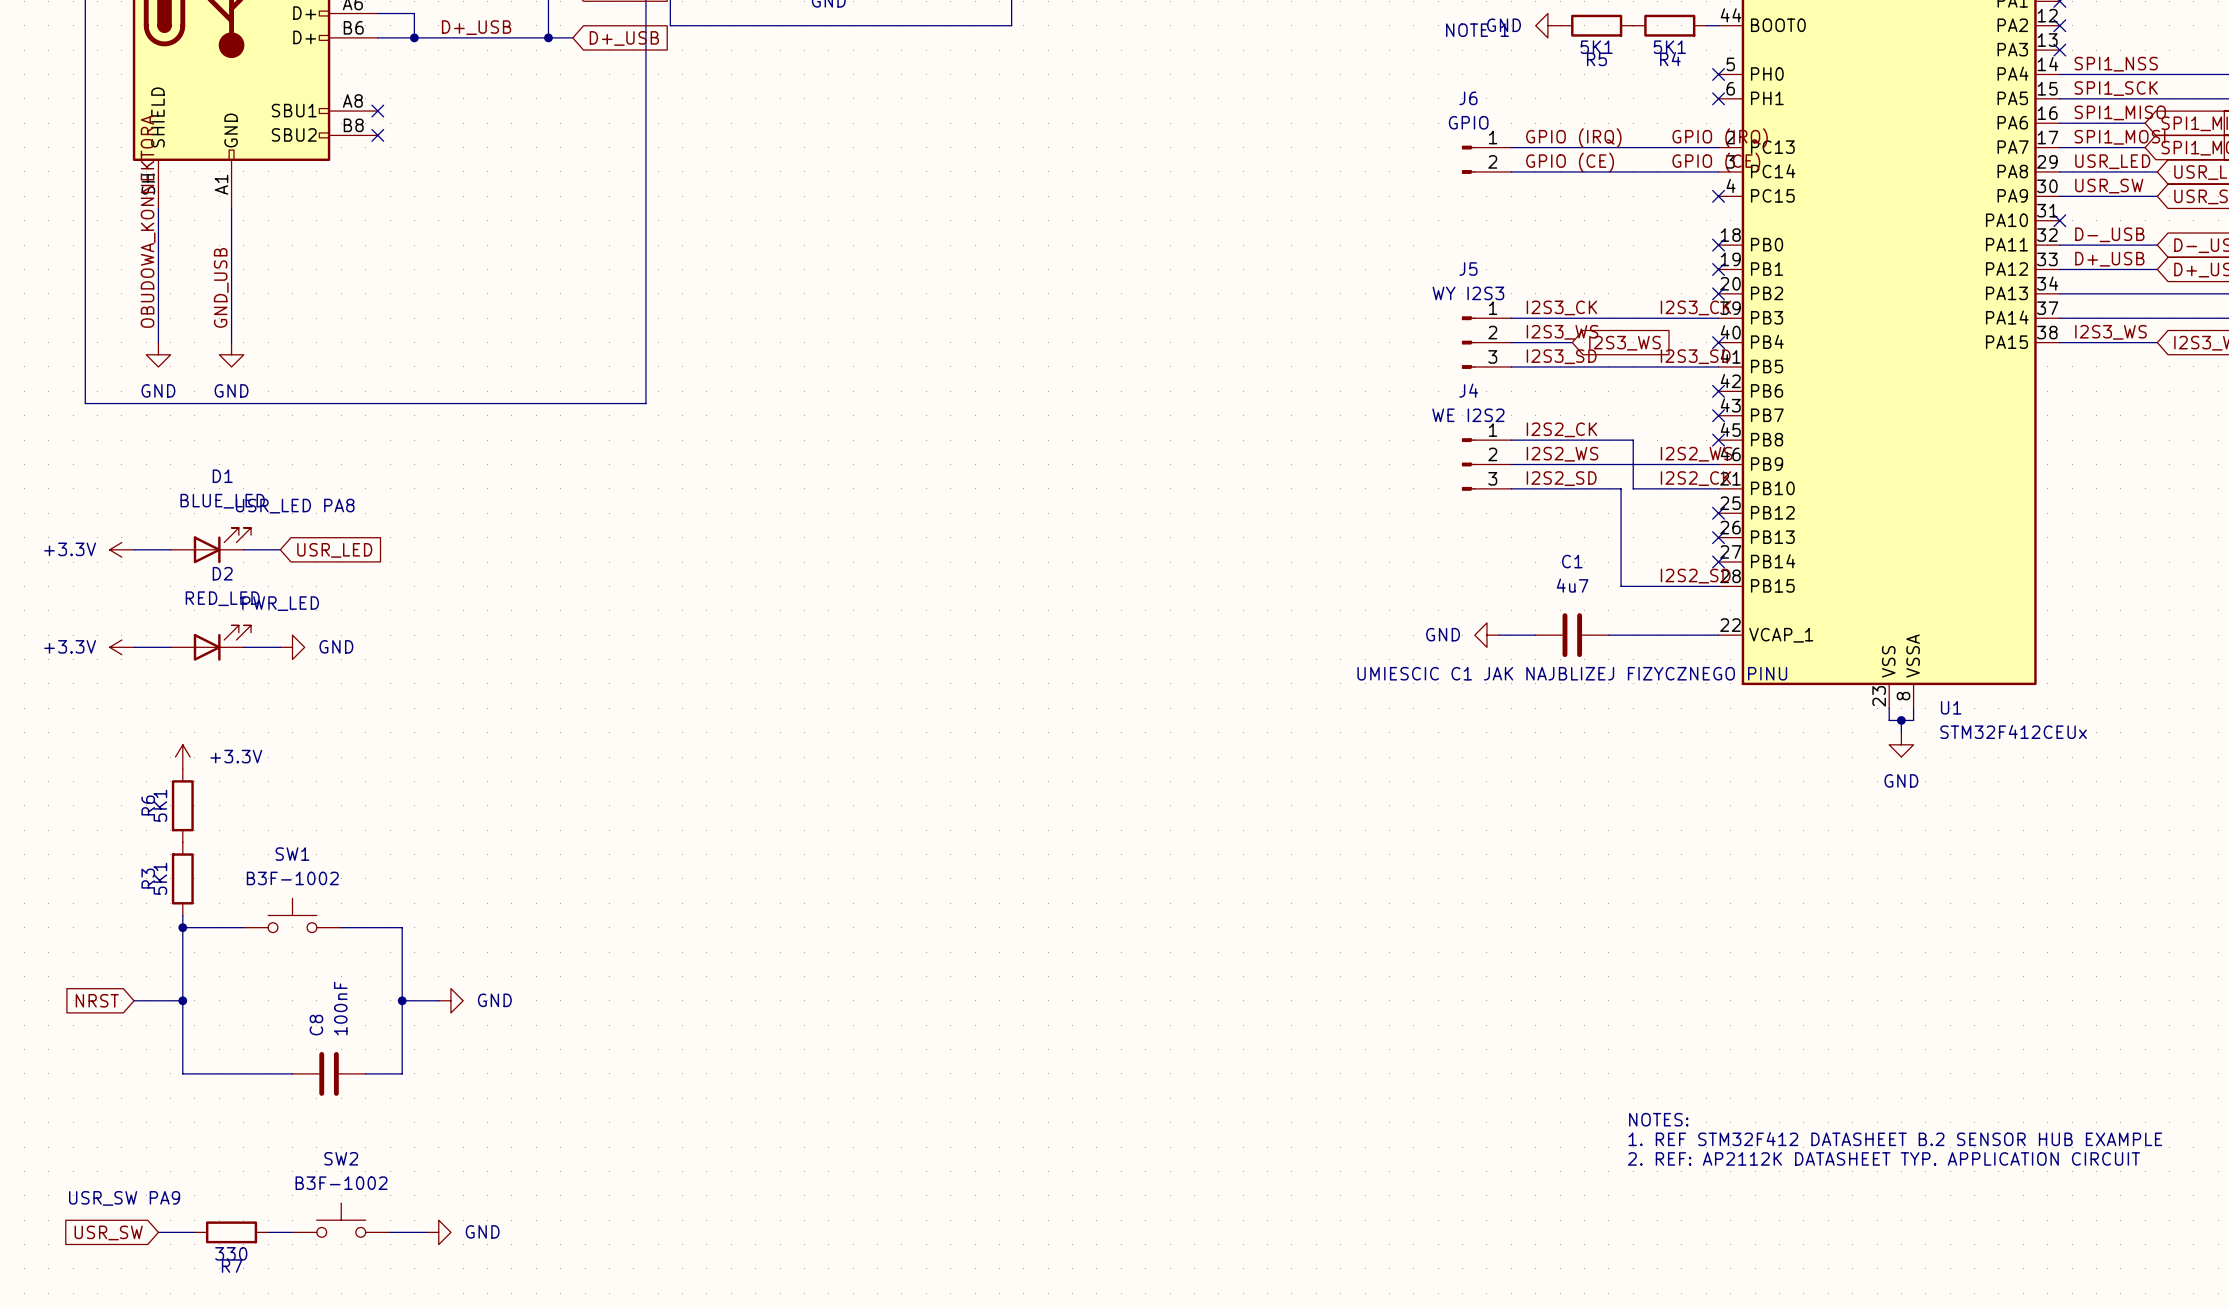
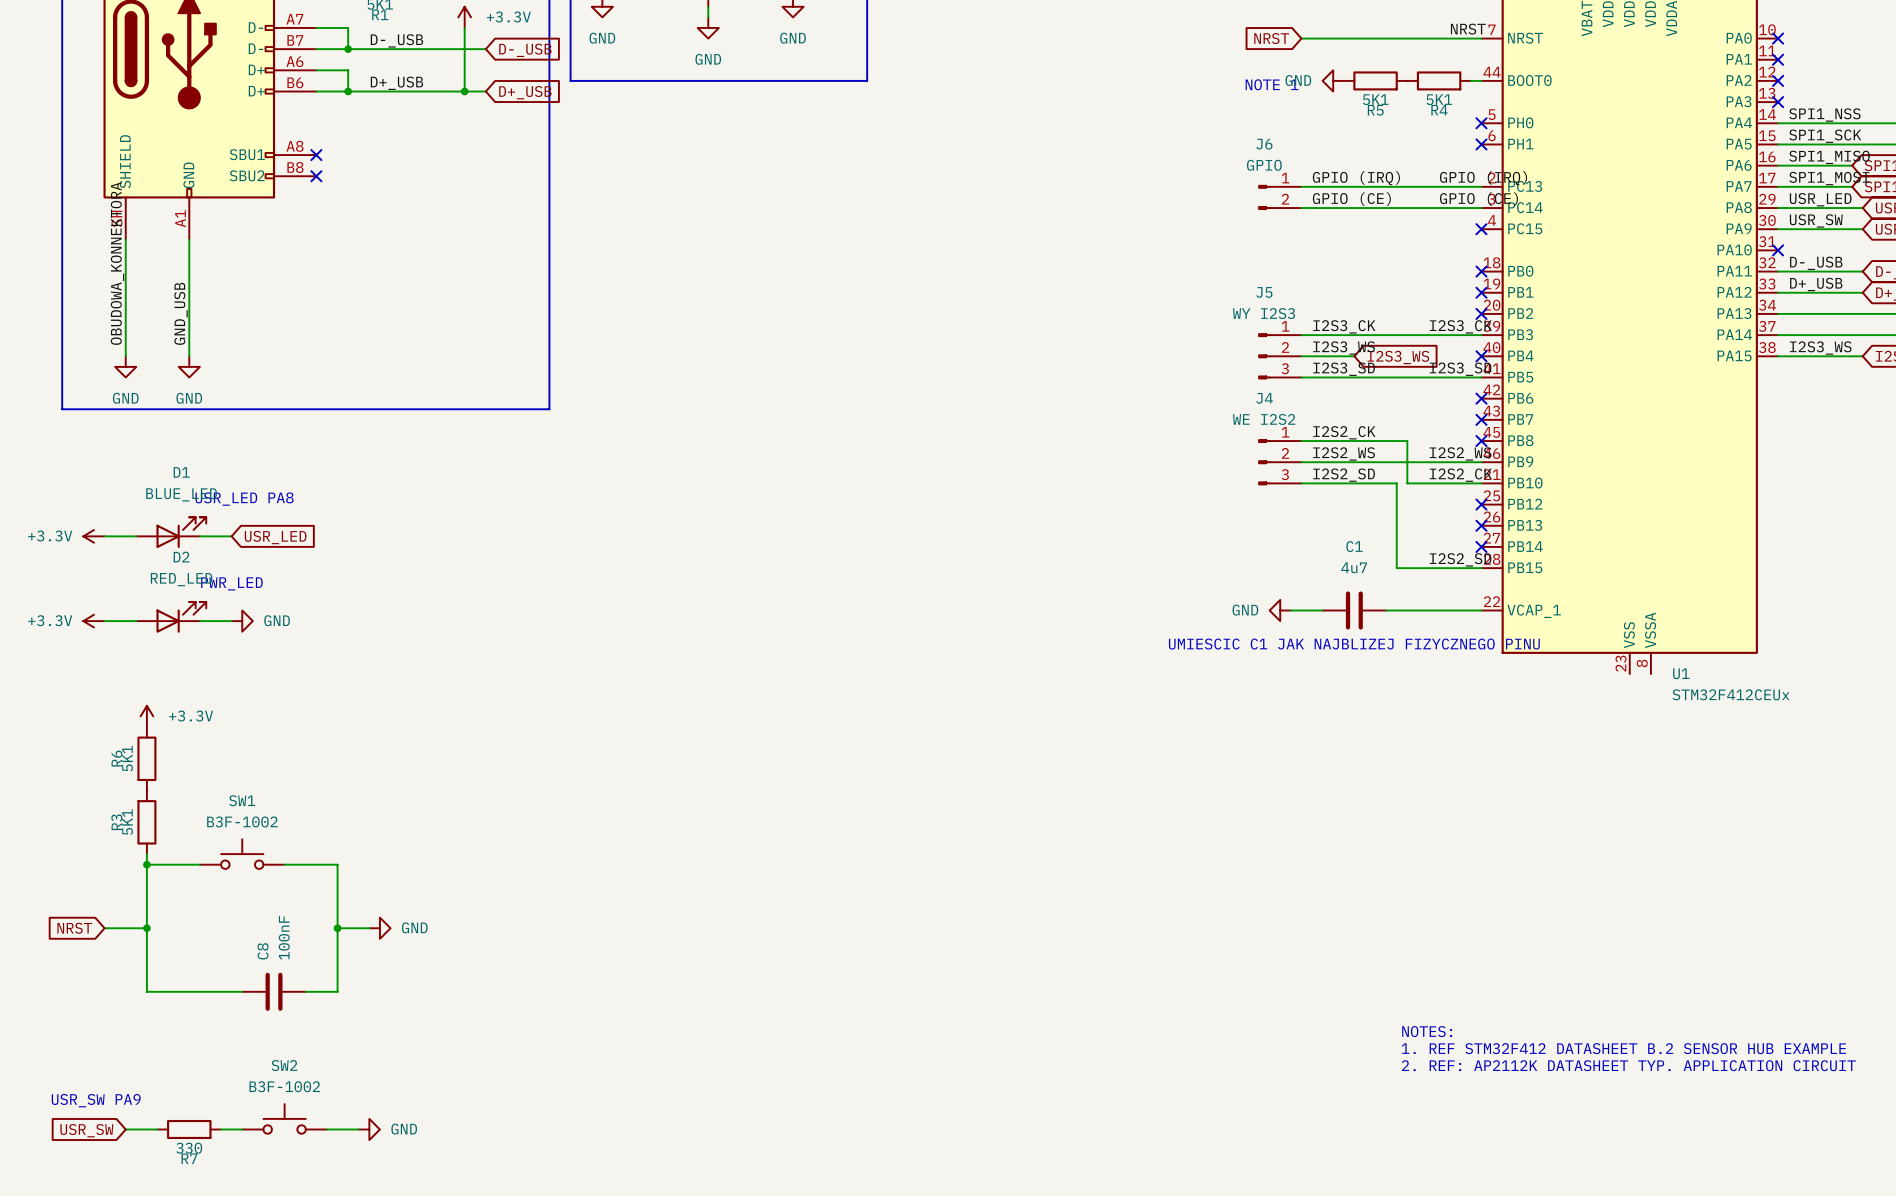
wire: (1889, 708) (1889, 720) (1913, 720) (1913, 708) -> none
wire: (1901, 720) (1901, 732) -> none
junction: (1901, 720) -> none
power symbol: GND (1901, 744) -> none

